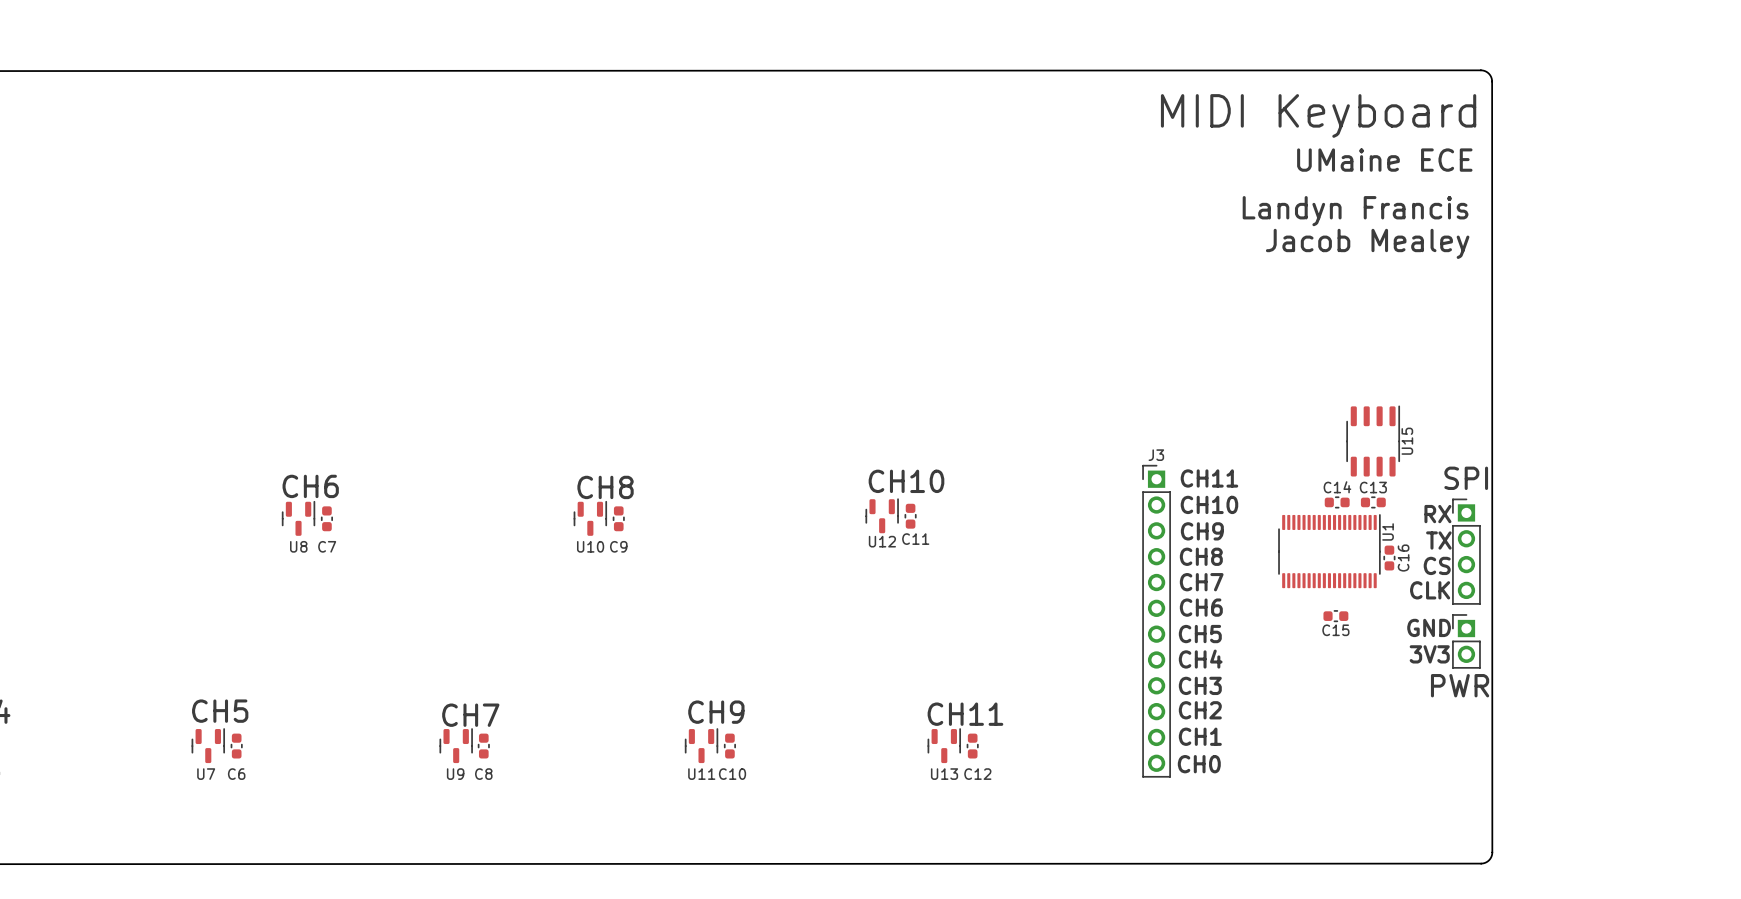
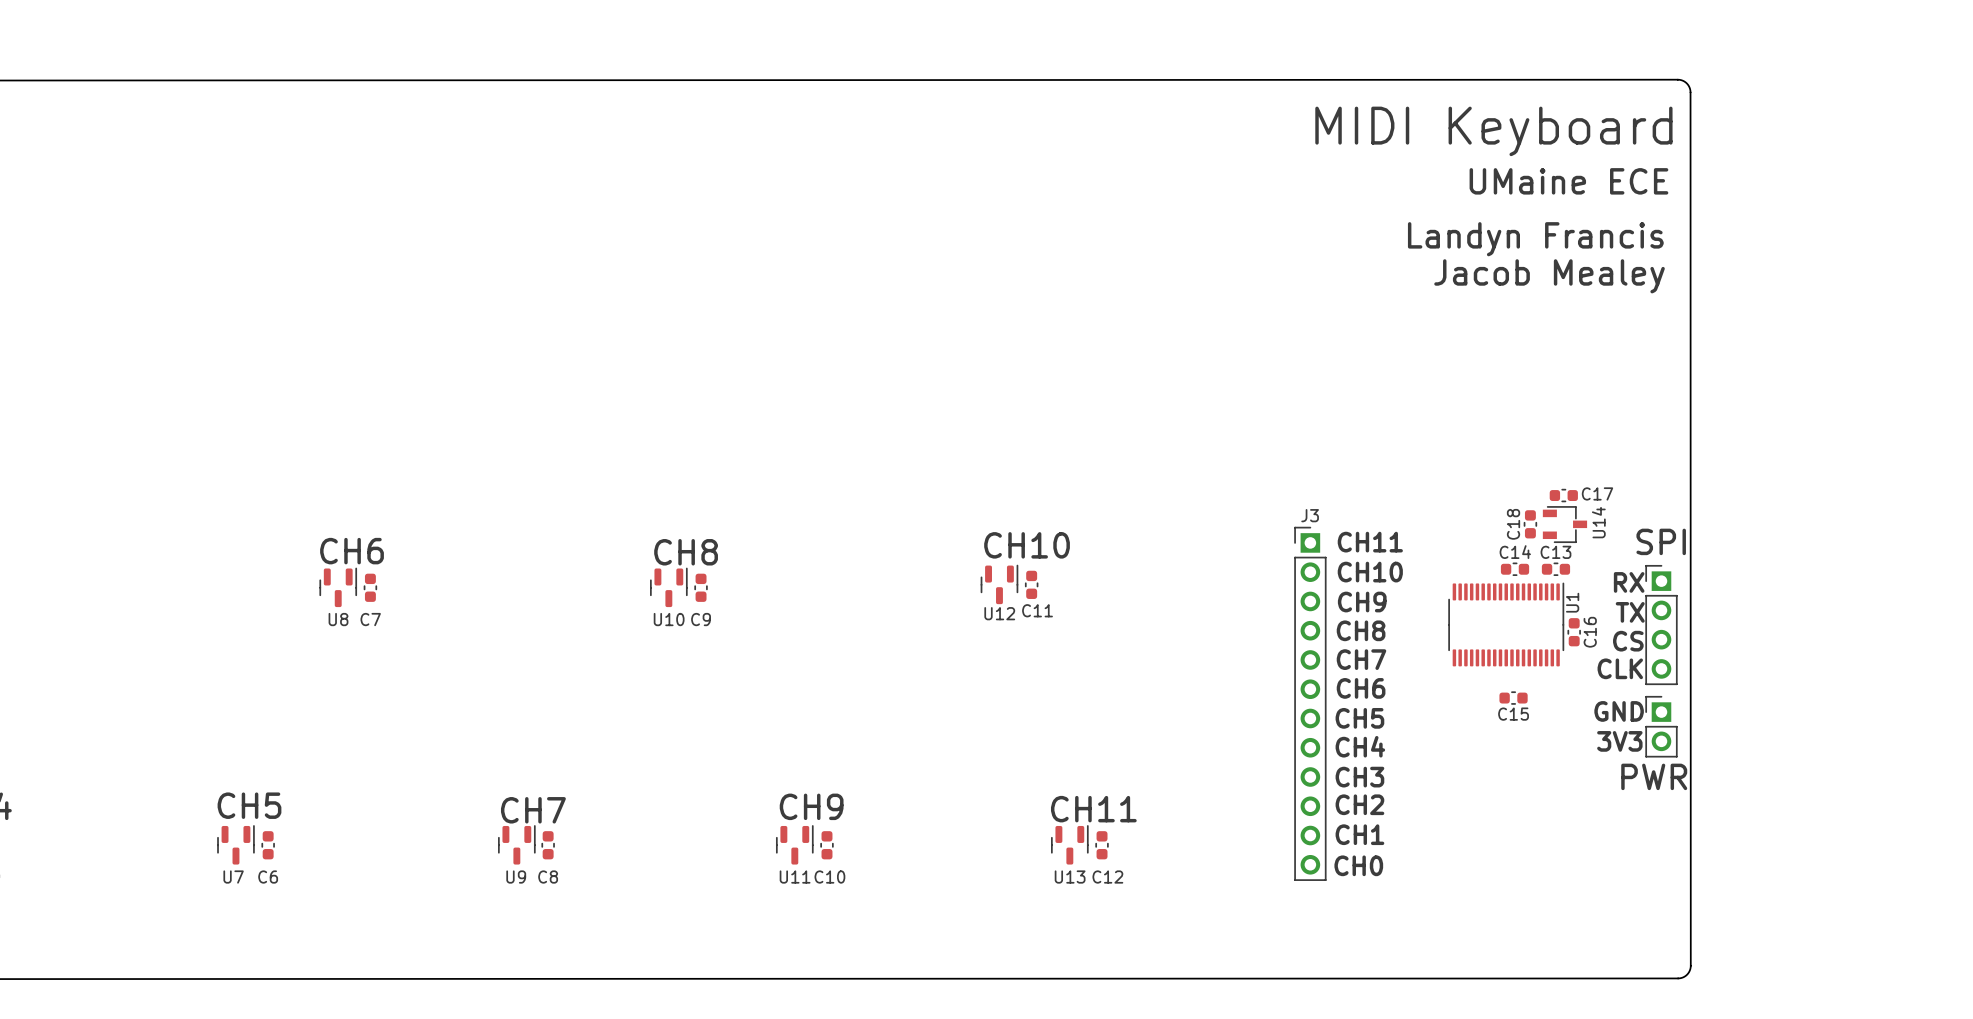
C17: none -> (1563, 495)
U15: (1373, 441) -> none
C18: none -> (1530, 524)
U14: none -> (1564, 524)

